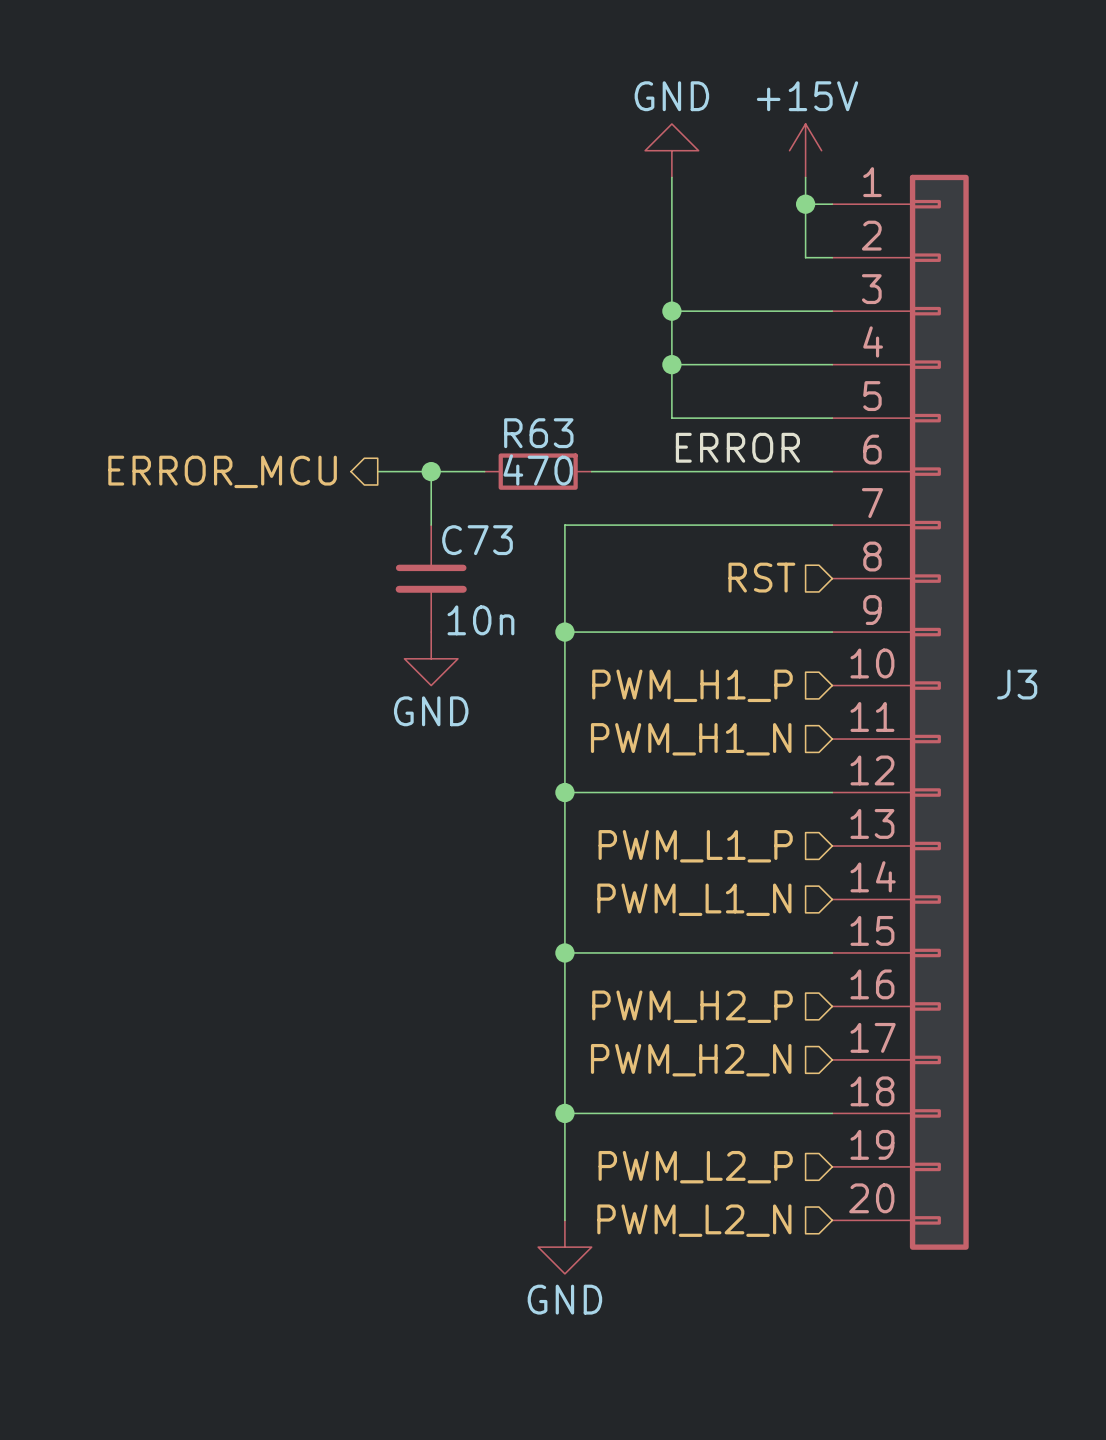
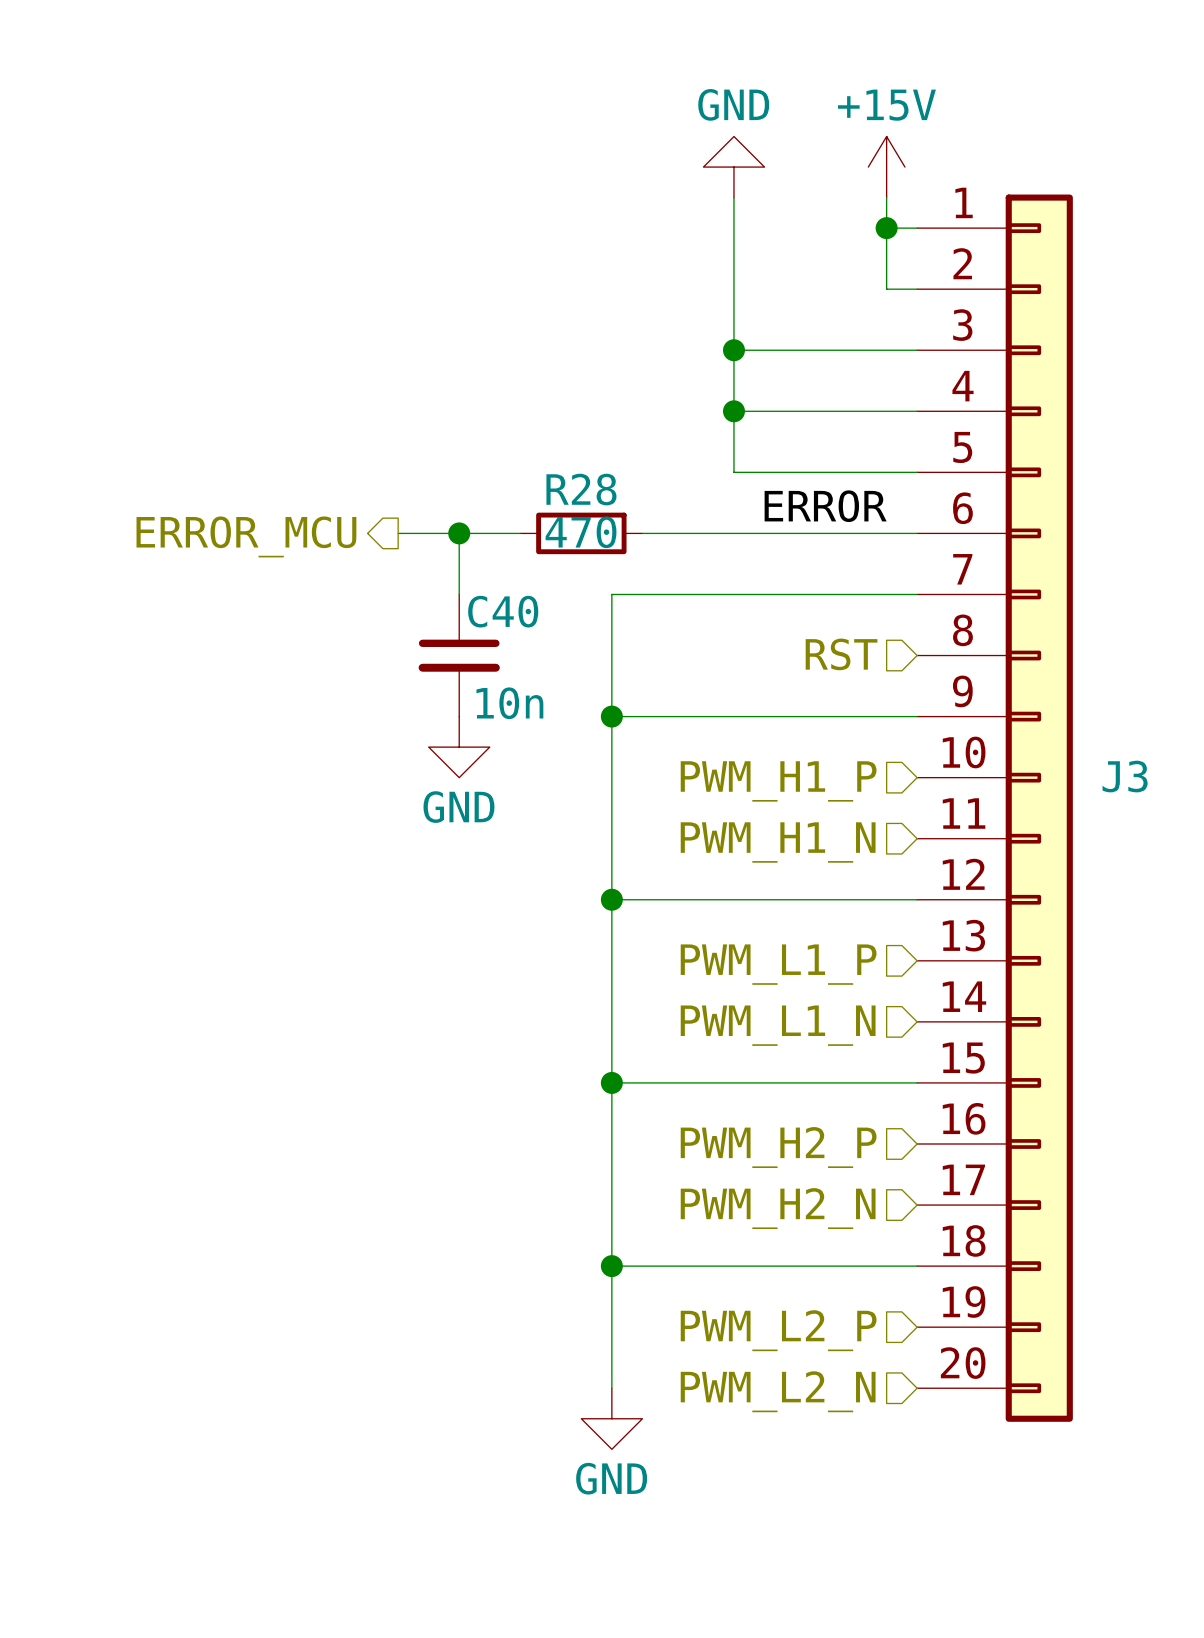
R63 name: R63 (538, 433) -> R28 (581, 489)
C73 name: C73 (477, 540) -> C40 (503, 611)

